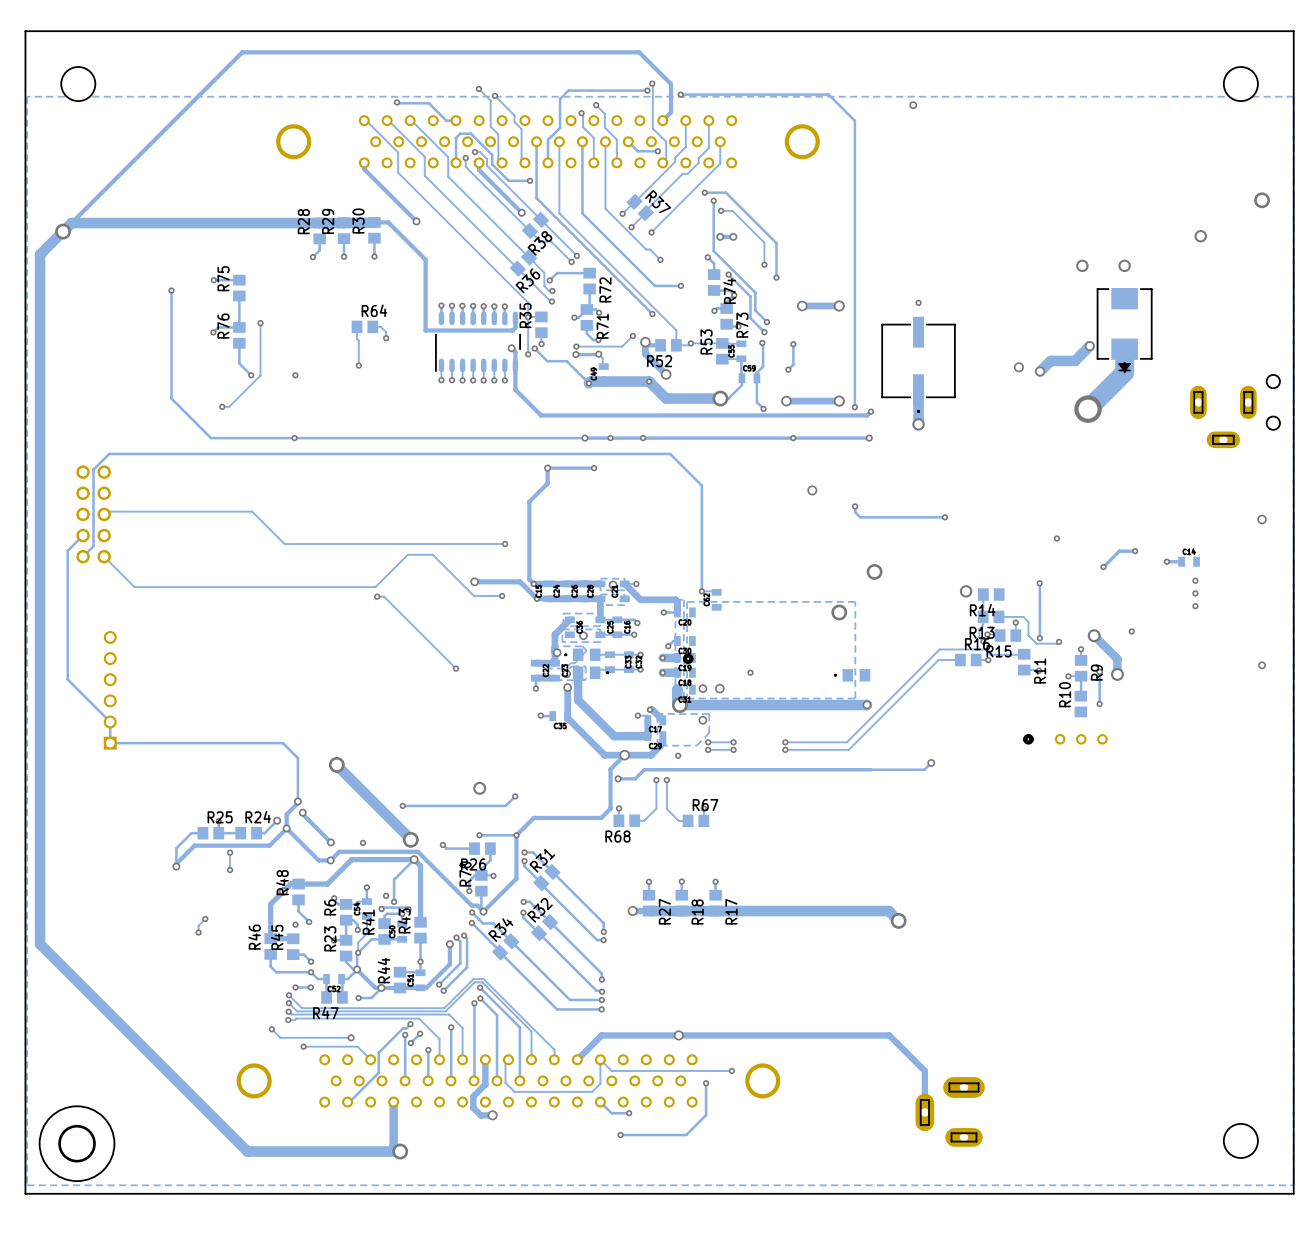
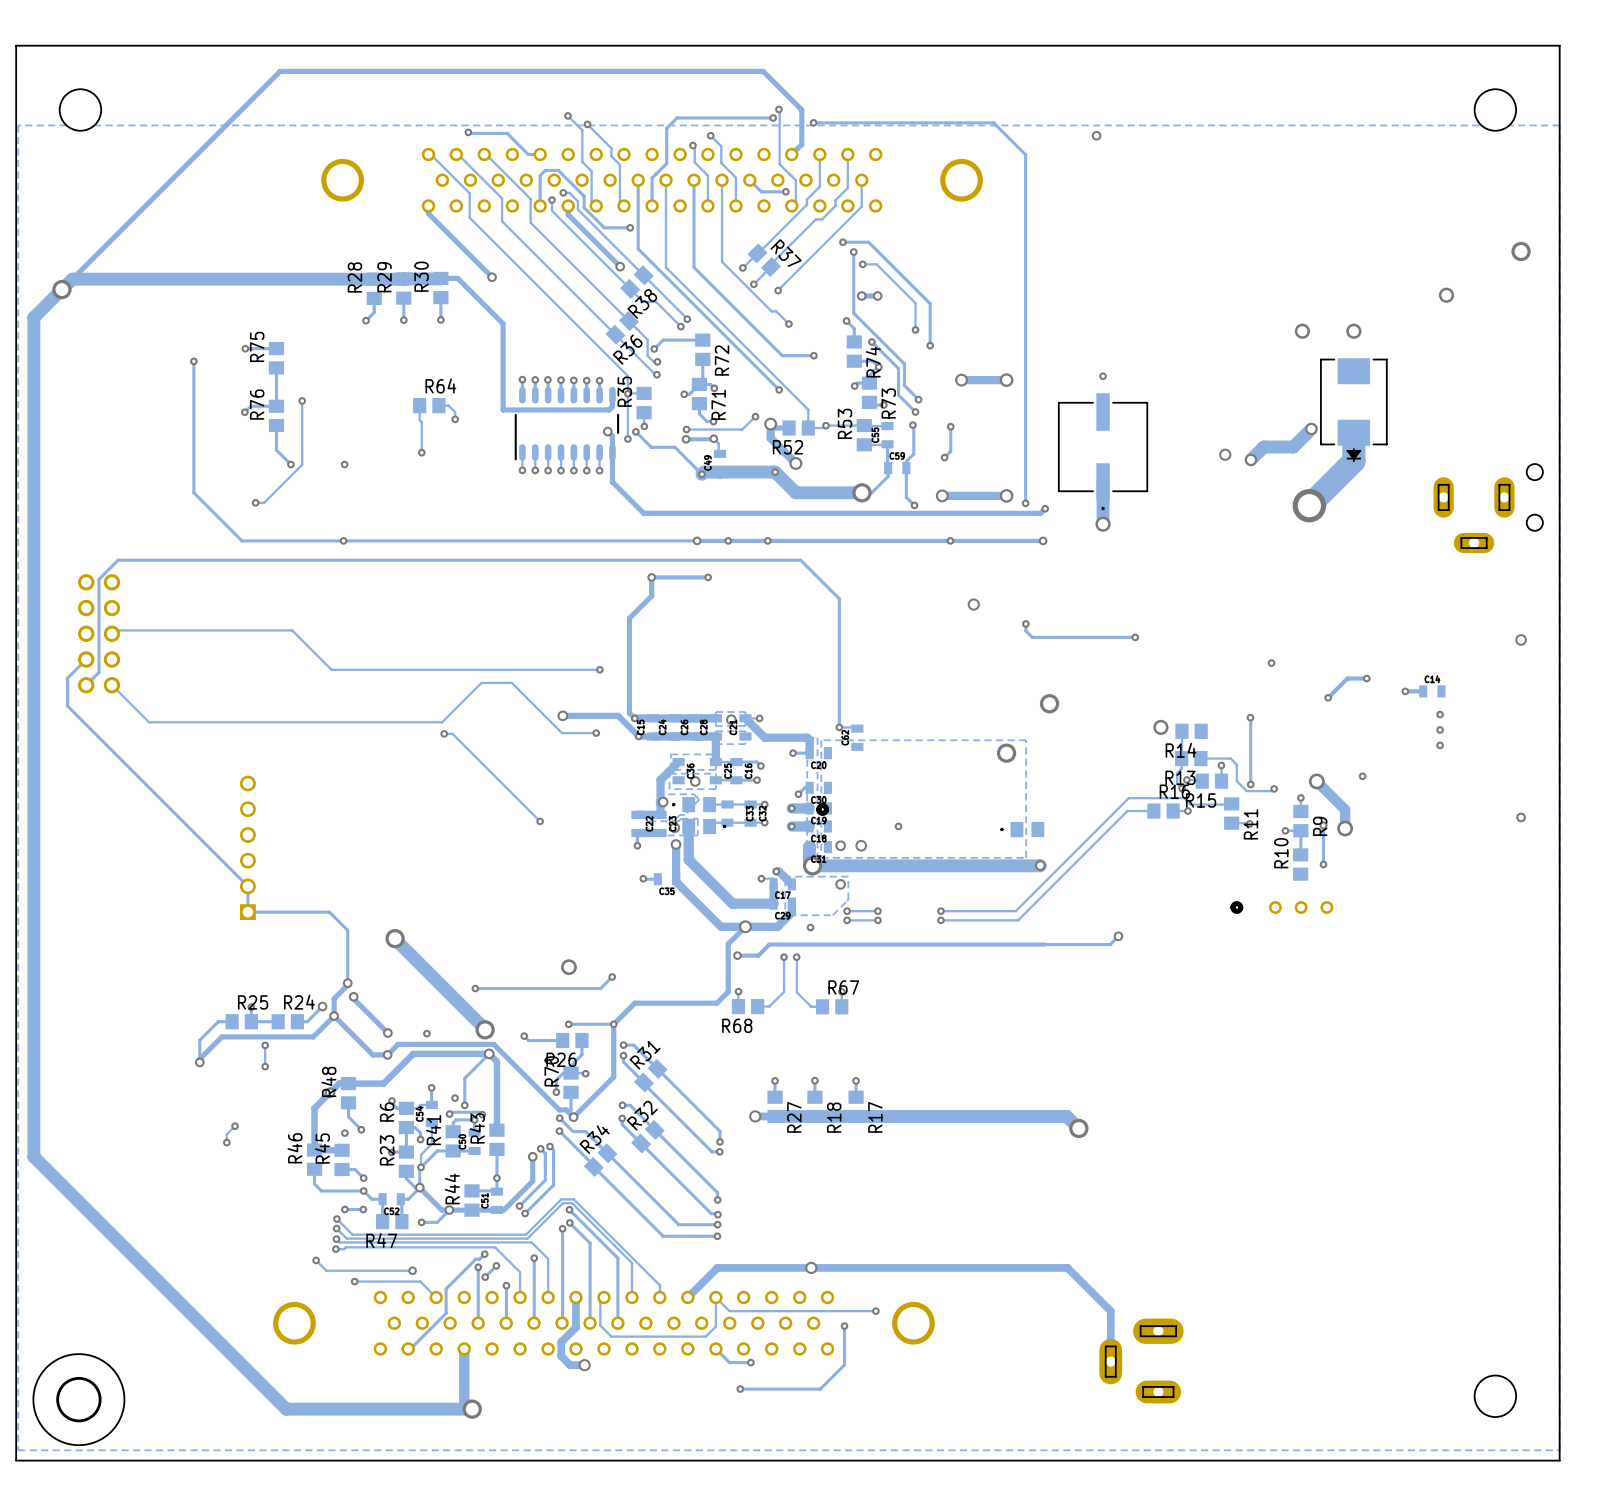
track: (67, 573) (67, 679) (110, 721) (110, 743) (215, 743) -> (67, 706) (247, 886) (247, 912)
part position: (110, 690) -> (247, 847)

